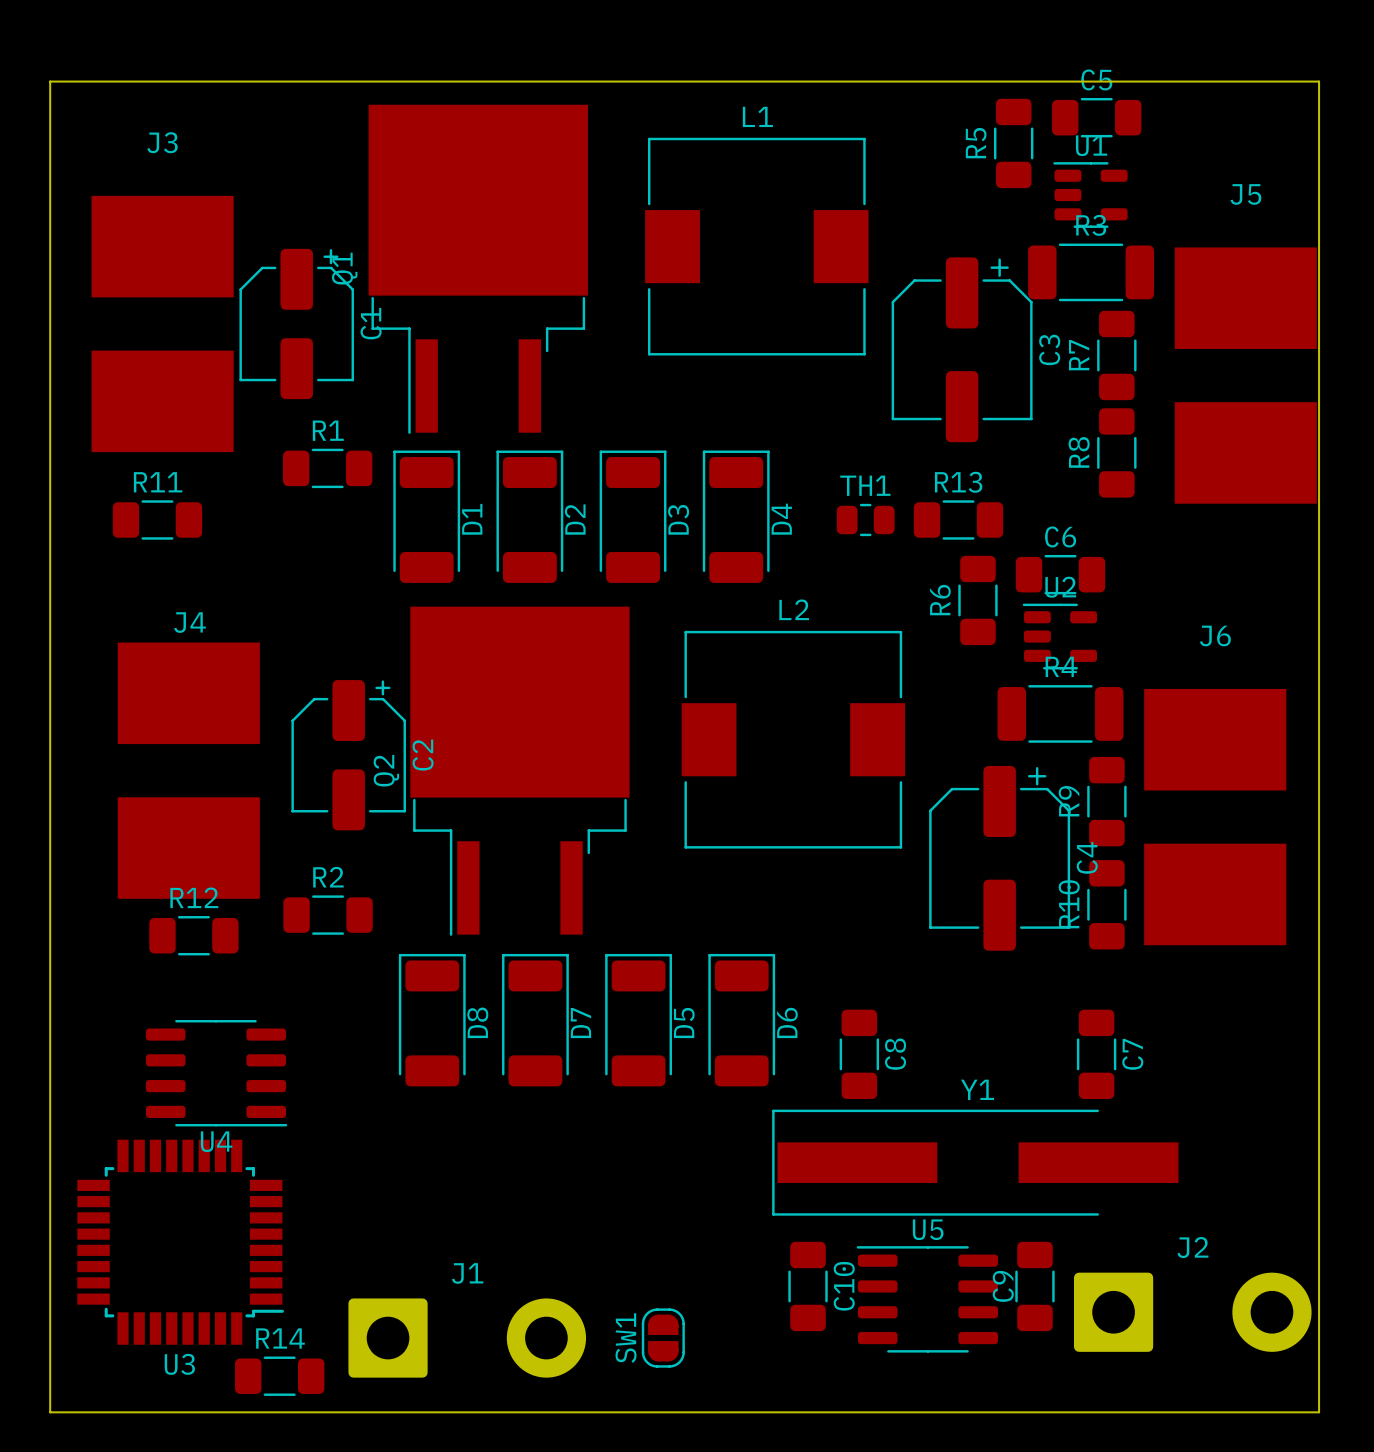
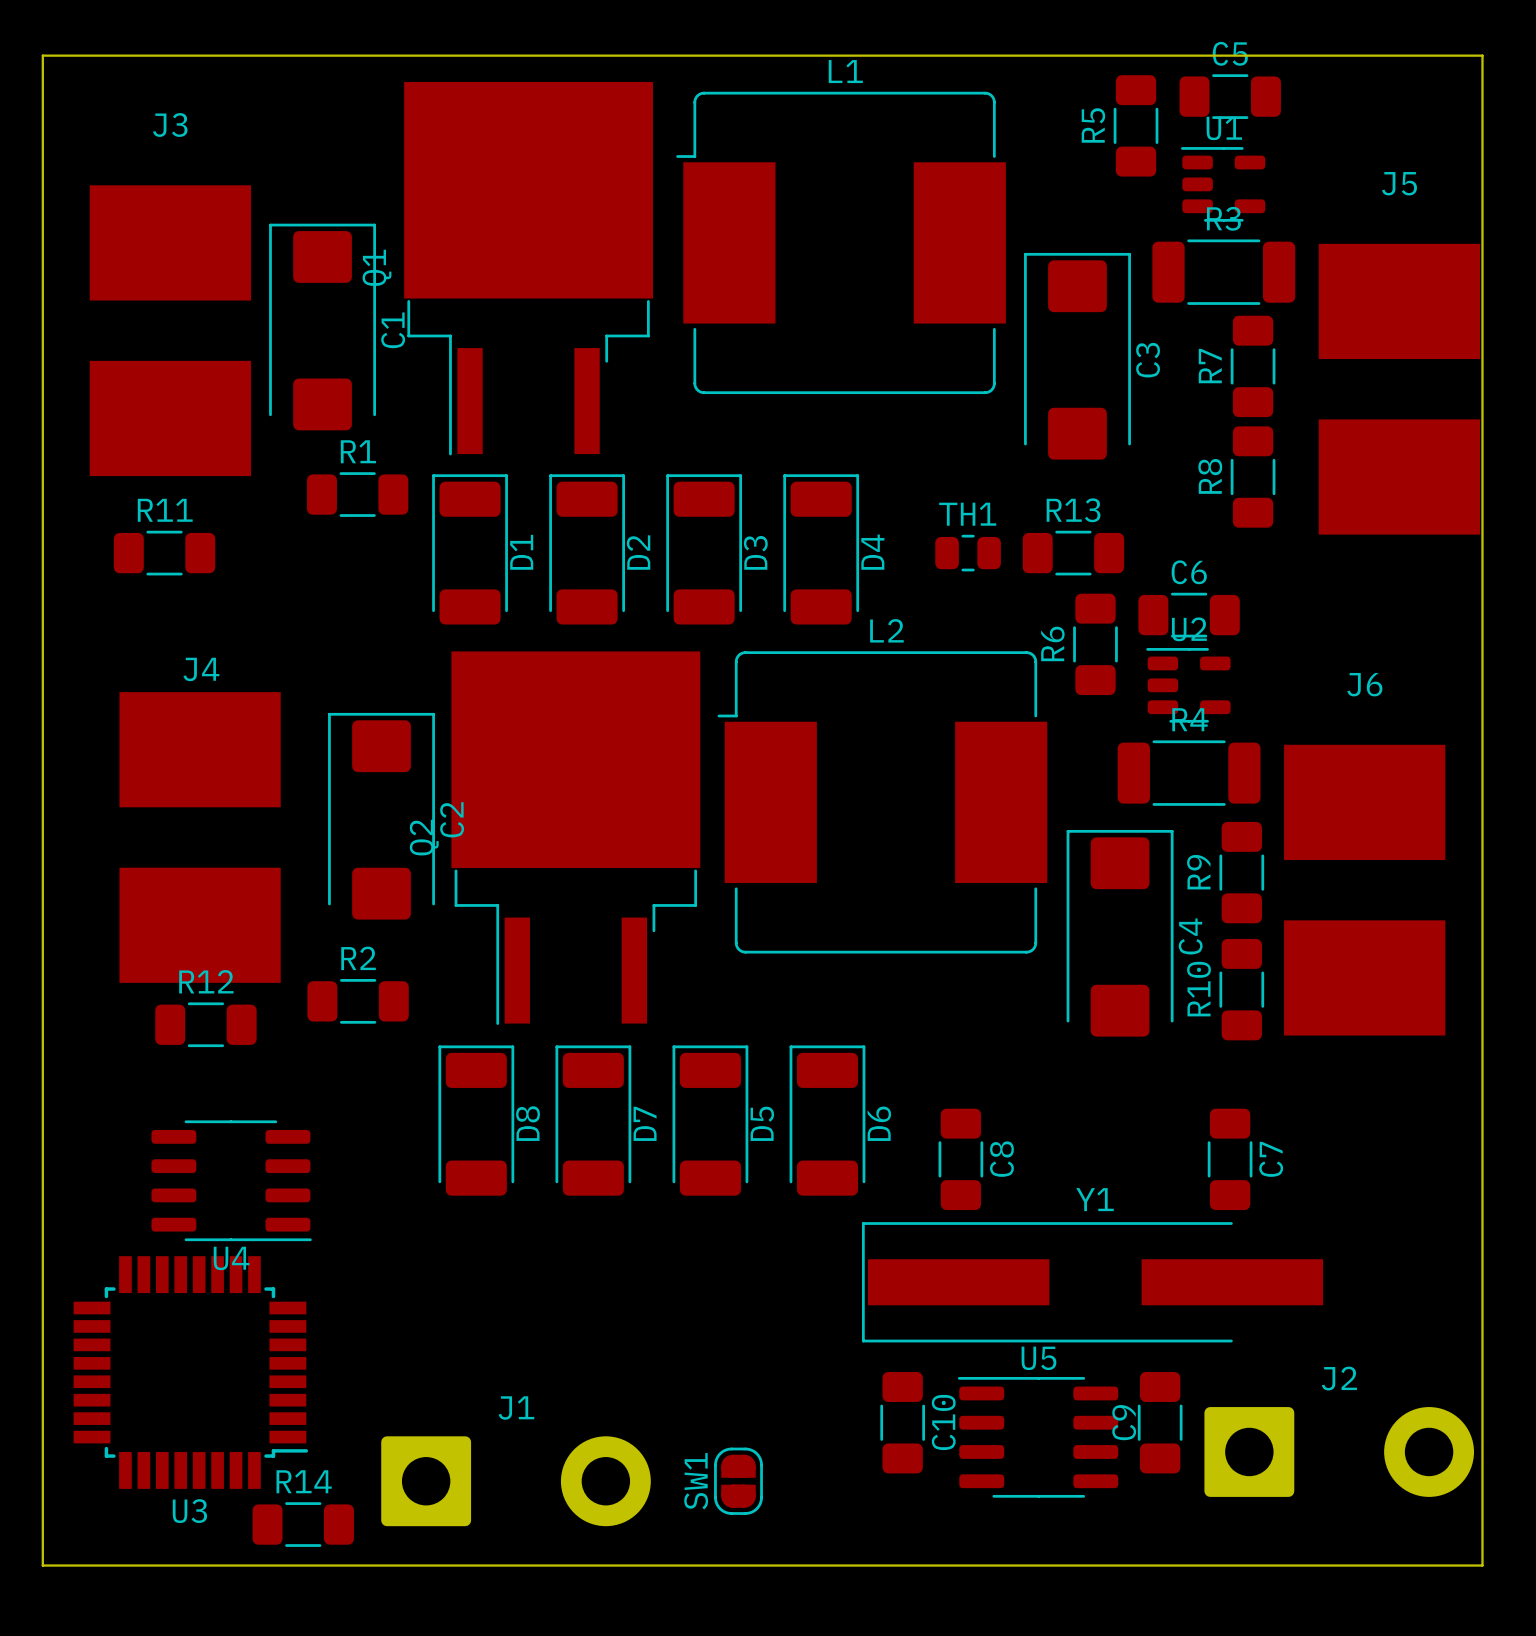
L1 footprint: [645, 137, 869, 356] -> [676, 91, 1006, 395]
C1 footprint: [239, 248, 354, 400] -> [269, 223, 377, 431]
C3 footprint: [891, 257, 1033, 443] -> [1024, 252, 1131, 460]
L2 footprint: [681, 630, 906, 849] -> [717, 651, 1048, 954]
C2 footprint: [291, 680, 406, 831] -> [328, 712, 435, 920]
C4 footprint: [929, 765, 1071, 951] -> [1066, 829, 1174, 1037]

